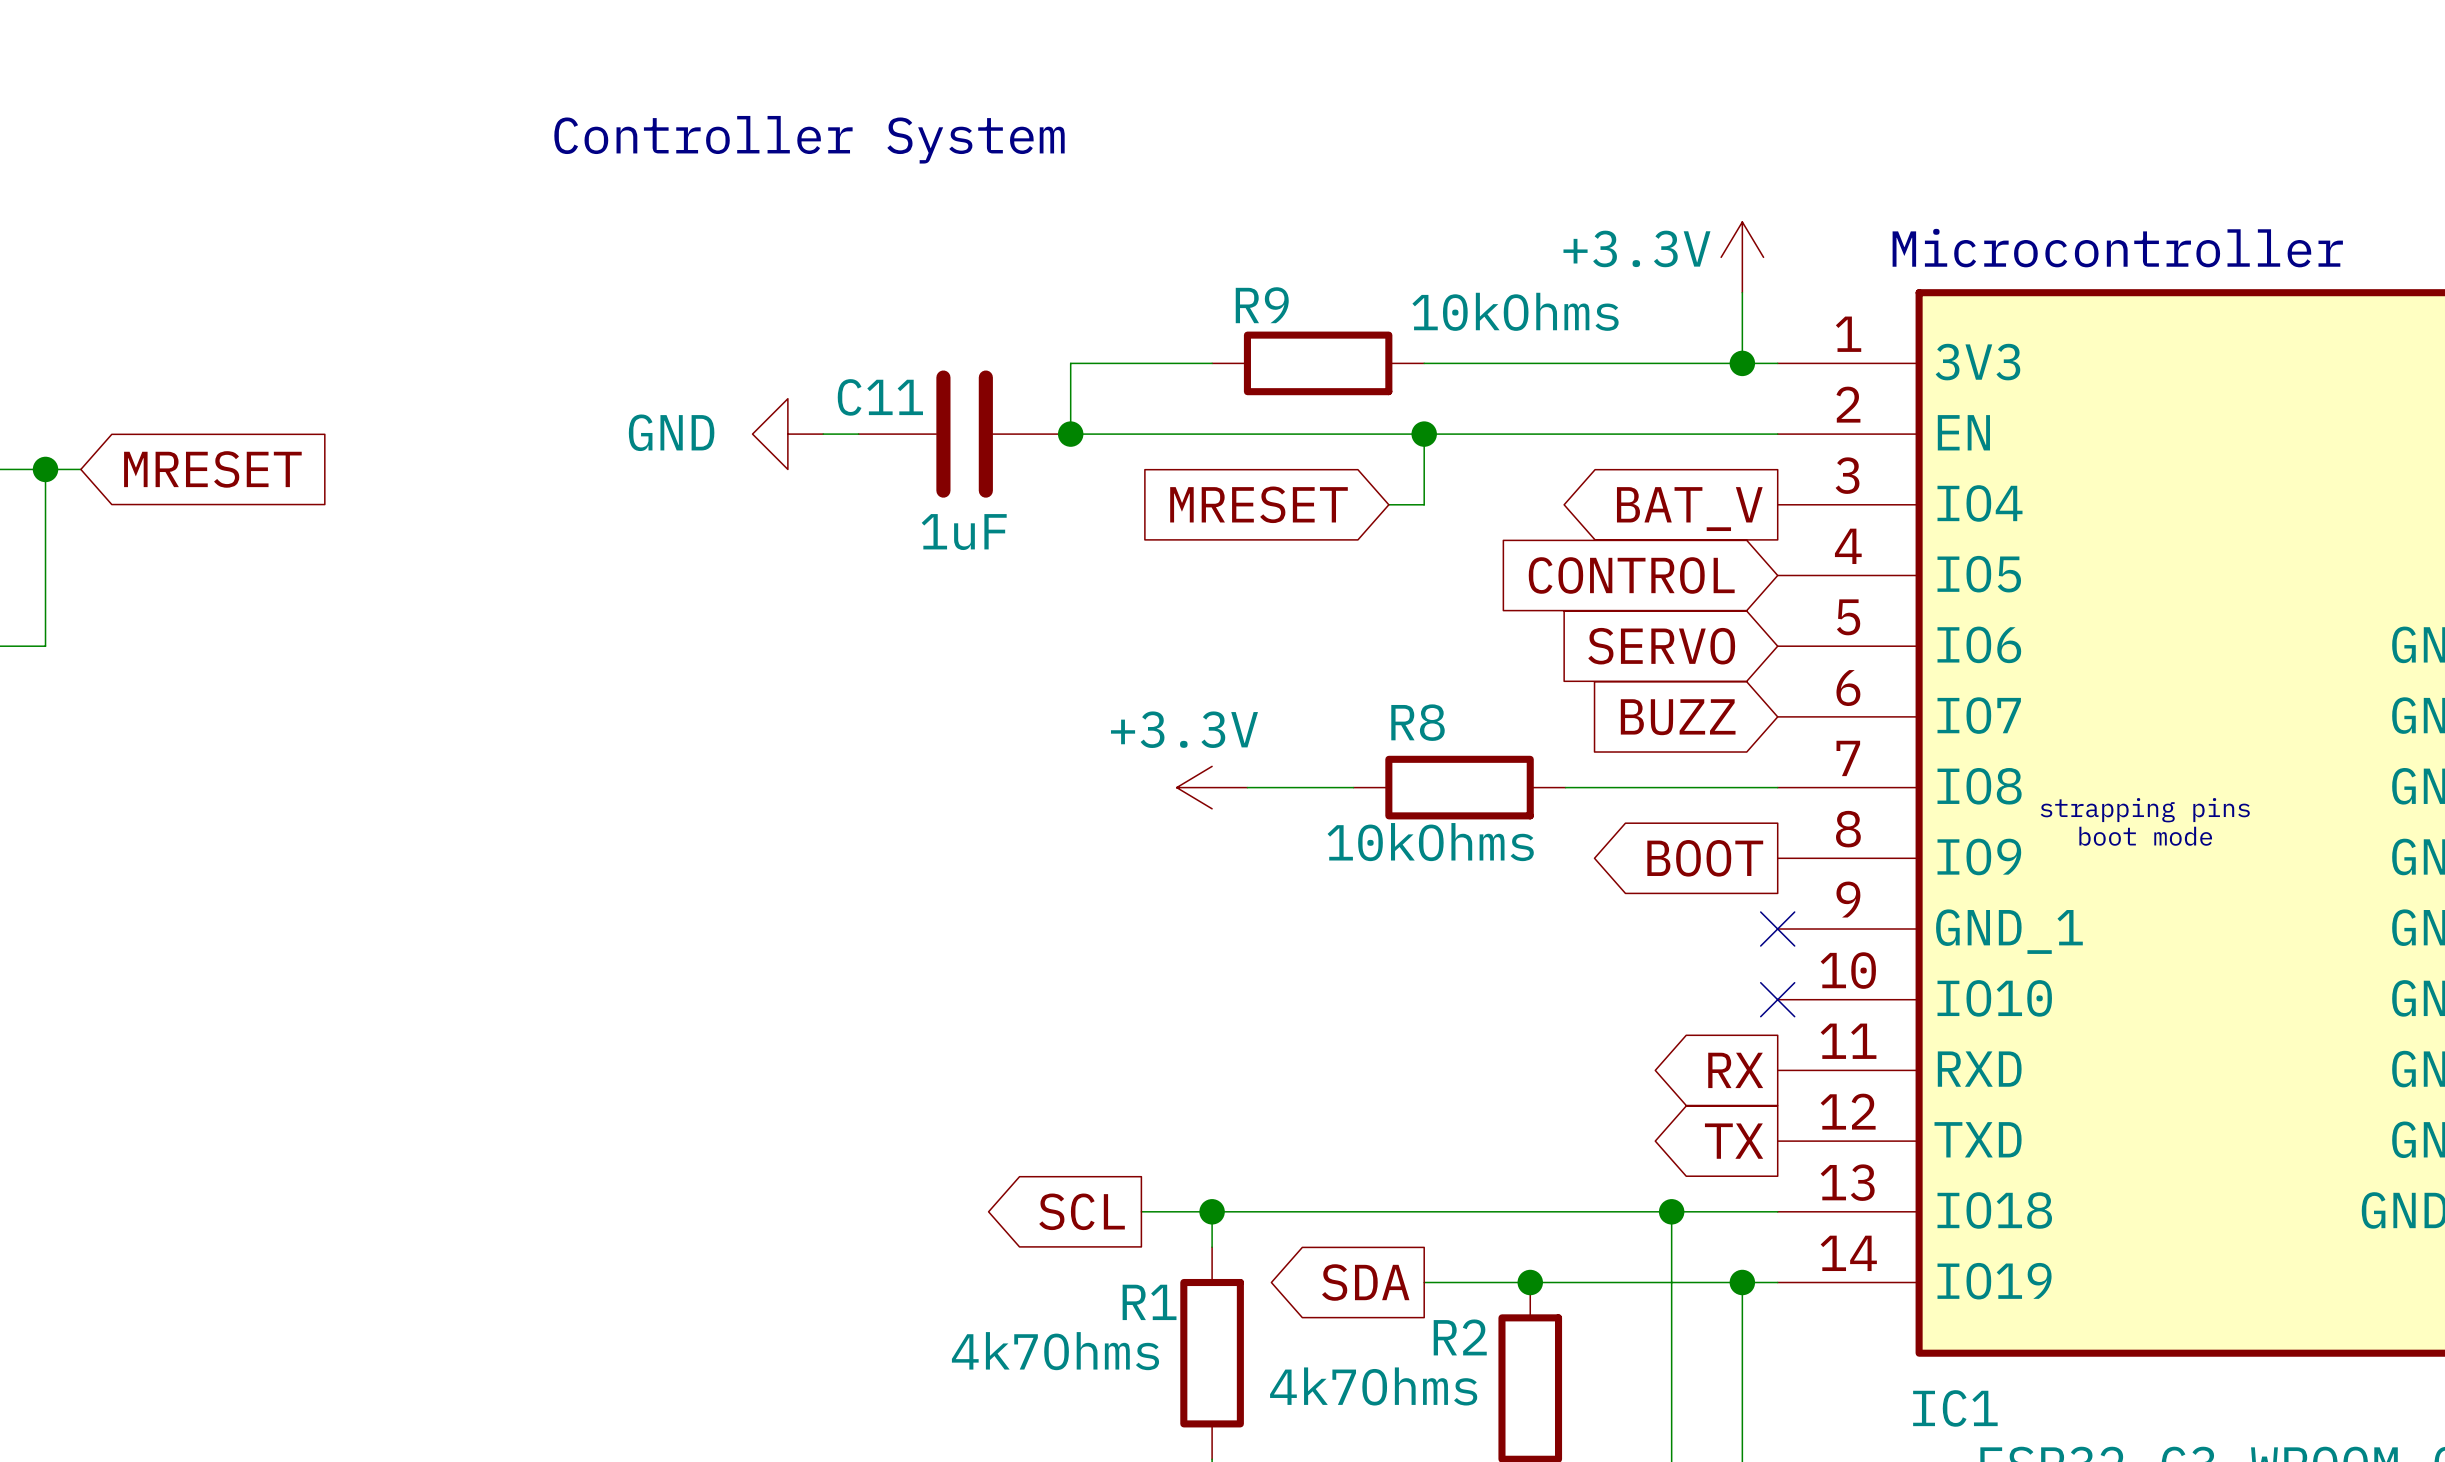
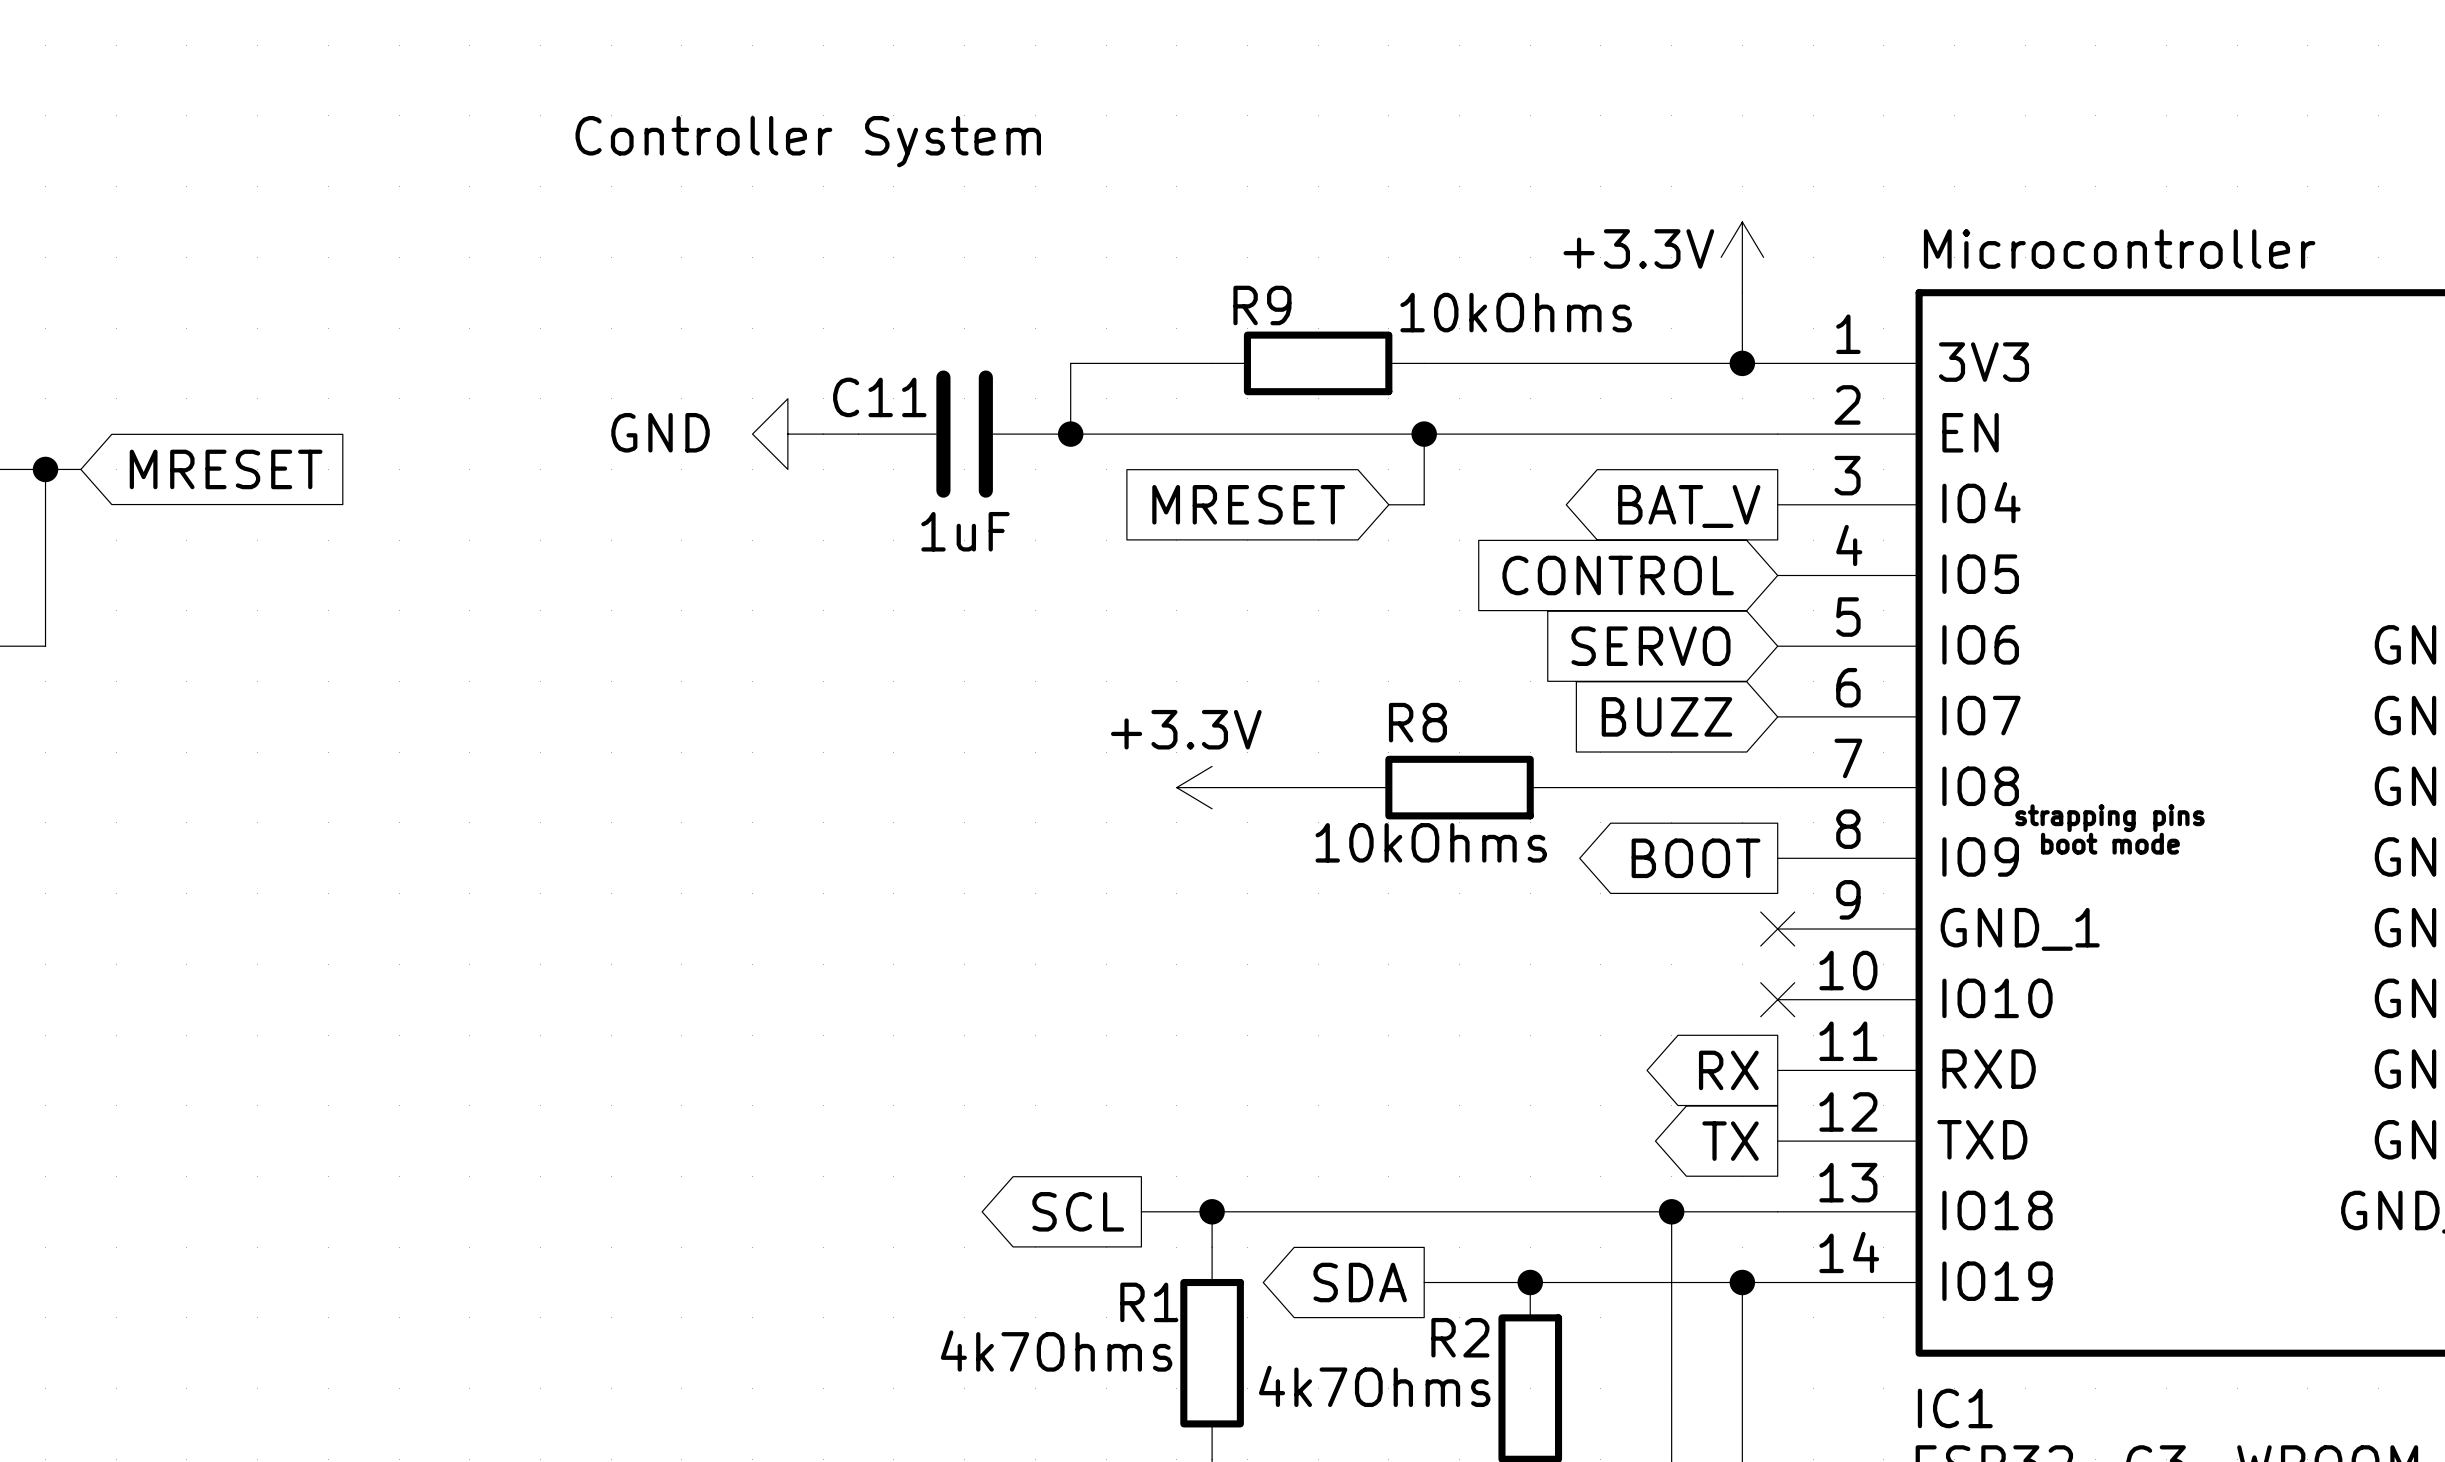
text position: strapping pins (2145, 810) -> strapping pins (2110, 818)
text position: boot mode (2145, 836) -> boot mode (2110, 843)

